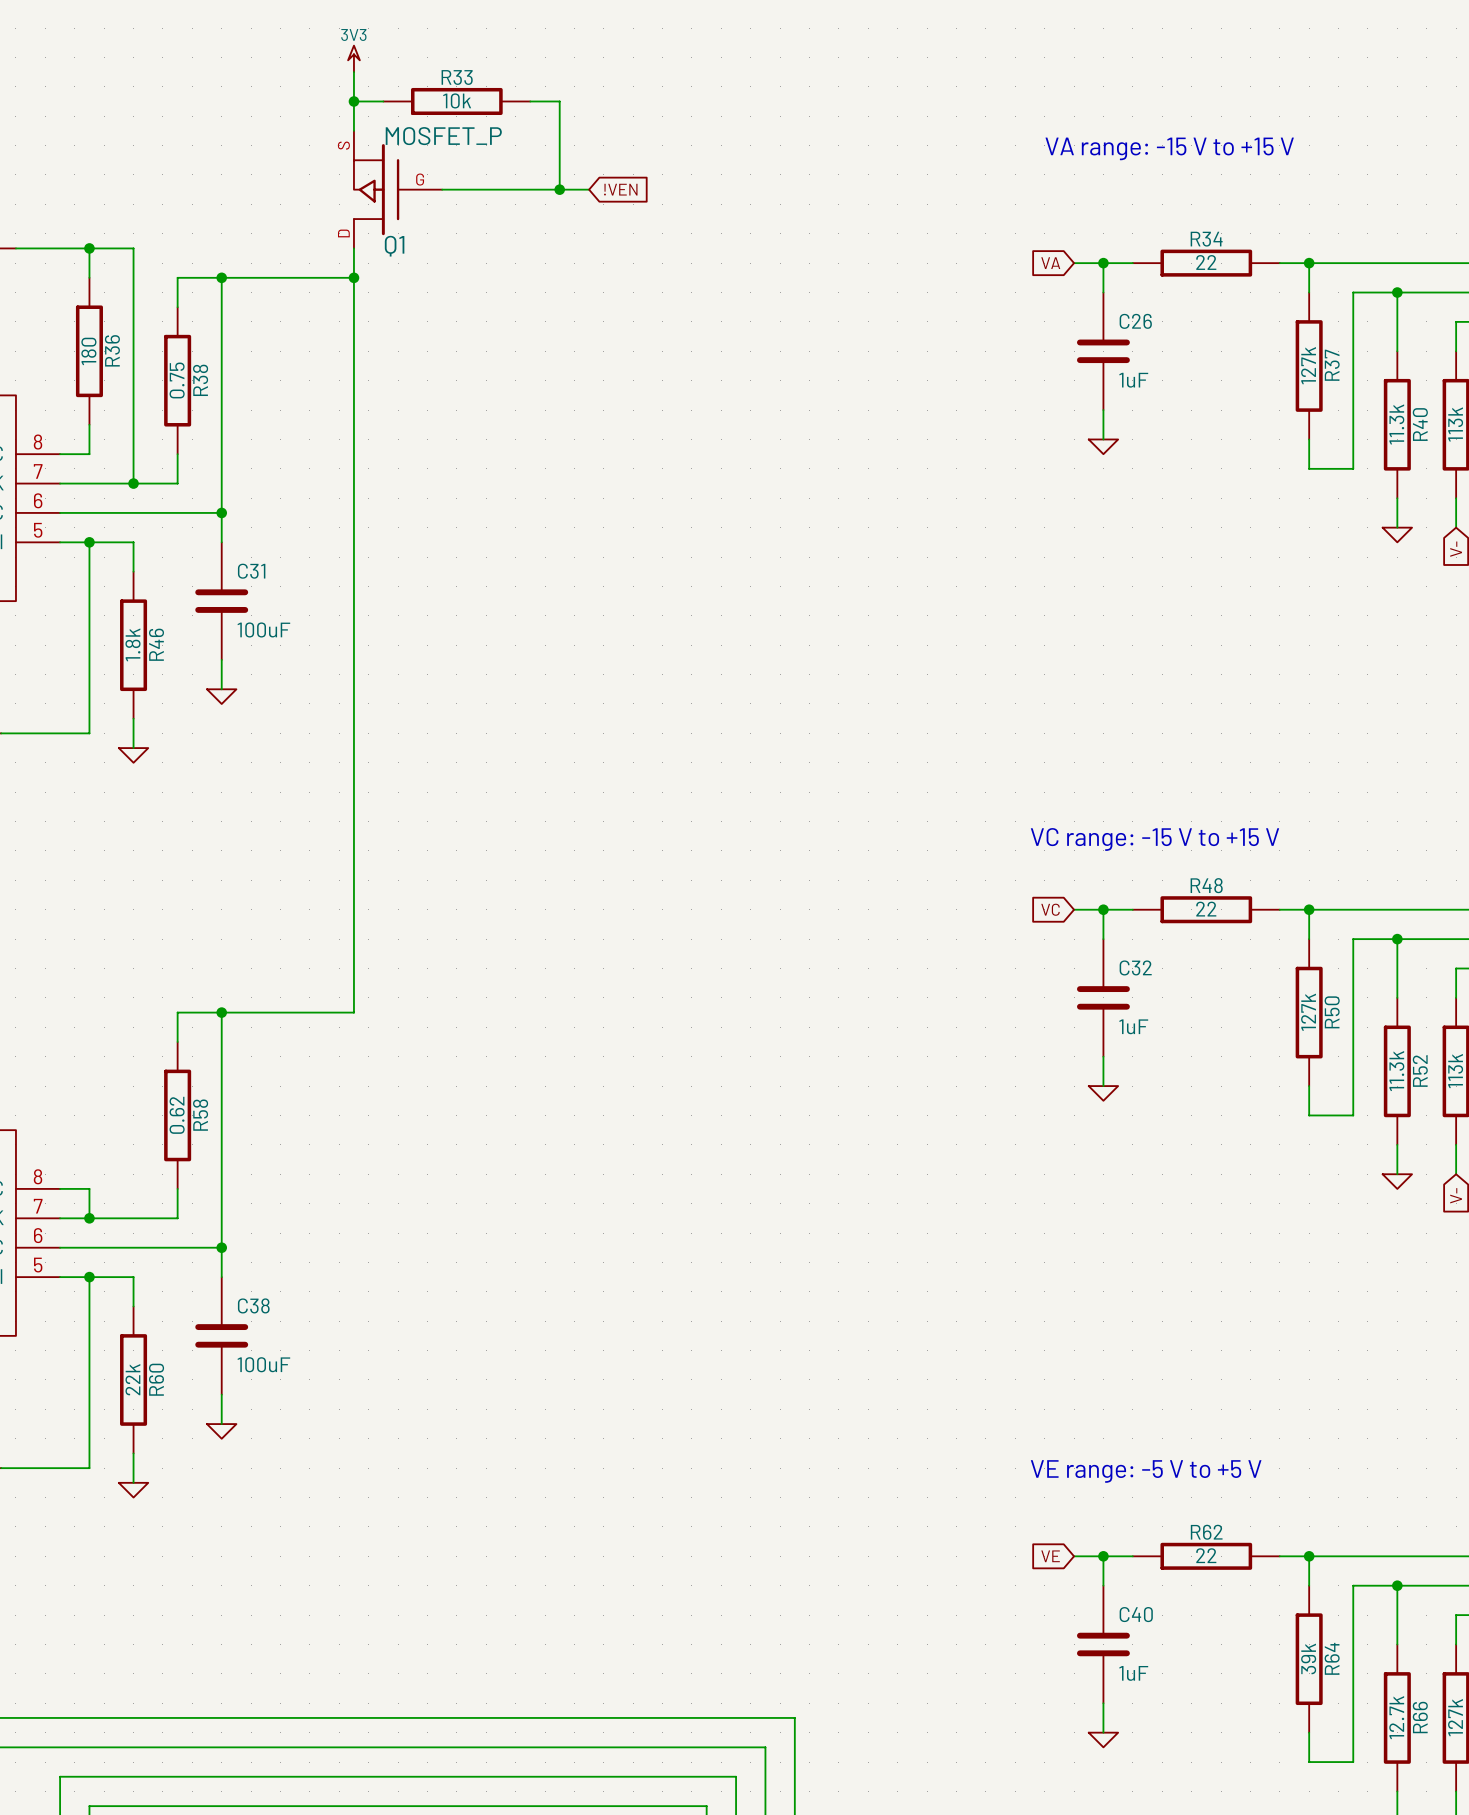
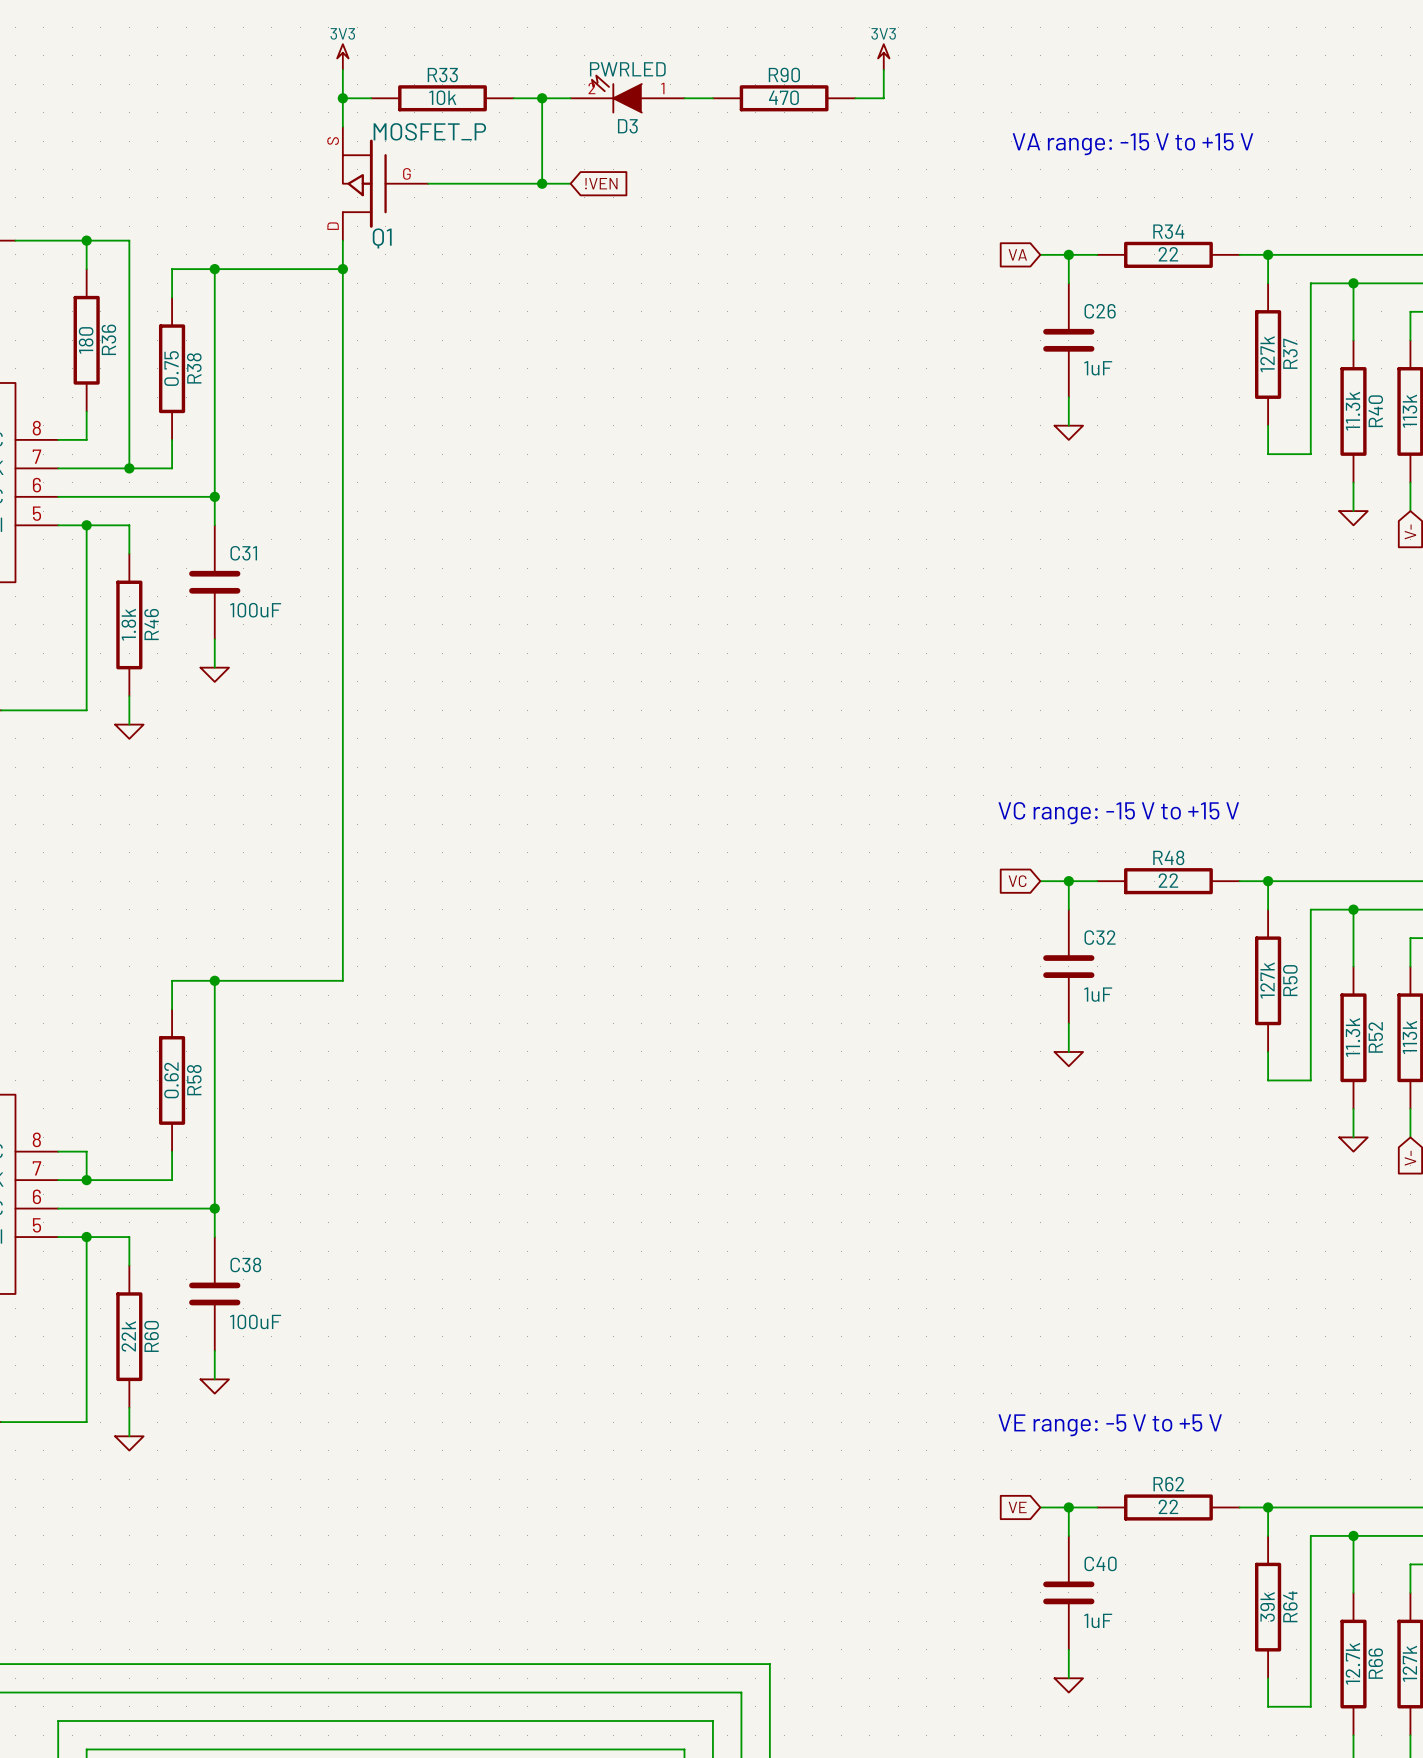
power symbol: none -> 3V3 (883, 57)
wire: none -> (883, 69) (883, 98) (855, 98)
D3: none -> PWRLED (627, 94)
wire: none -> (542, 98) (570, 98)
junction: none -> (542, 98)
wire: none -> (684, 98) (712, 98)
R90: none -> 470 (784, 98)

